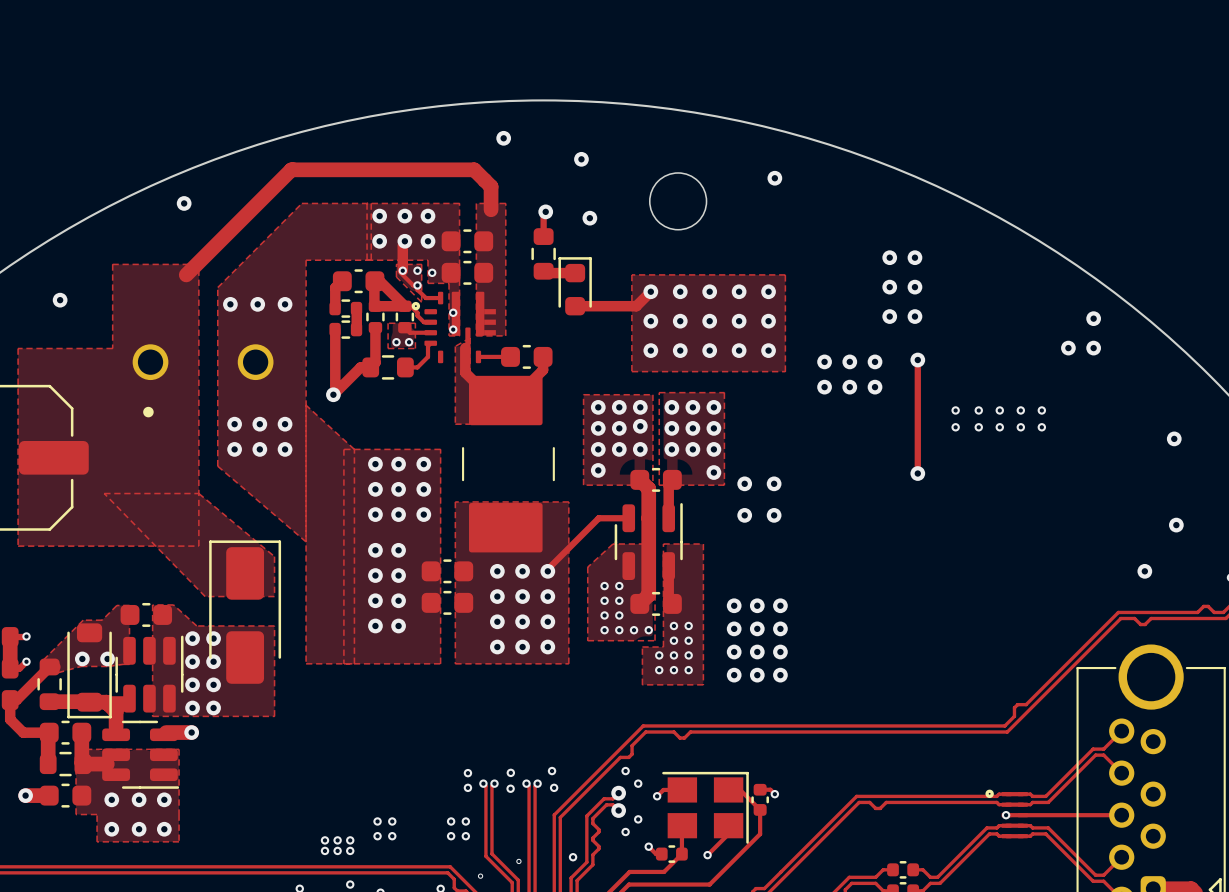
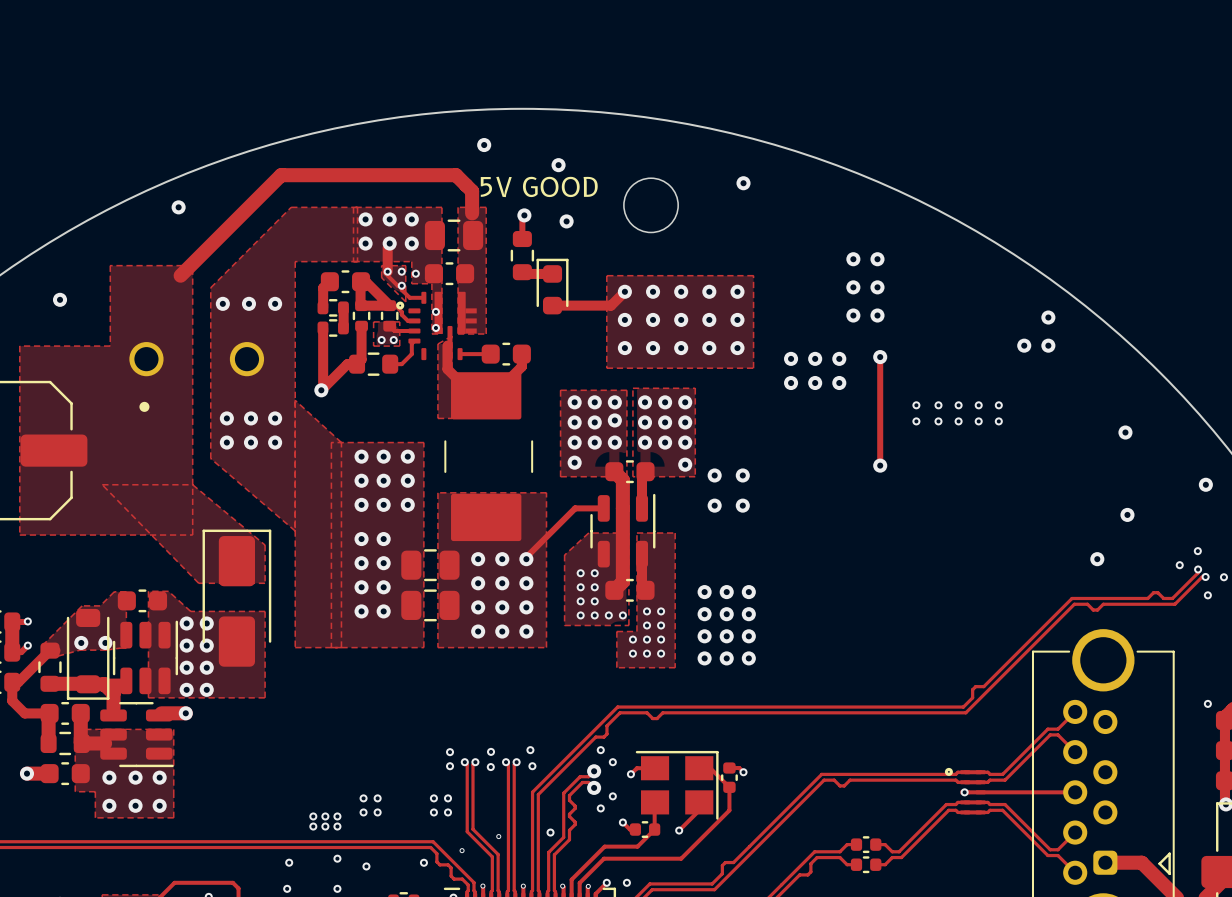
text: none -> 5V GOOD (539, 186)
part footprint: [441, 229, 494, 254] -> [424, 219, 484, 252]
part footprint: [421, 559, 474, 584] -> [401, 549, 460, 582]
part: (447, 602) -> none
part: none -> (430, 605)

